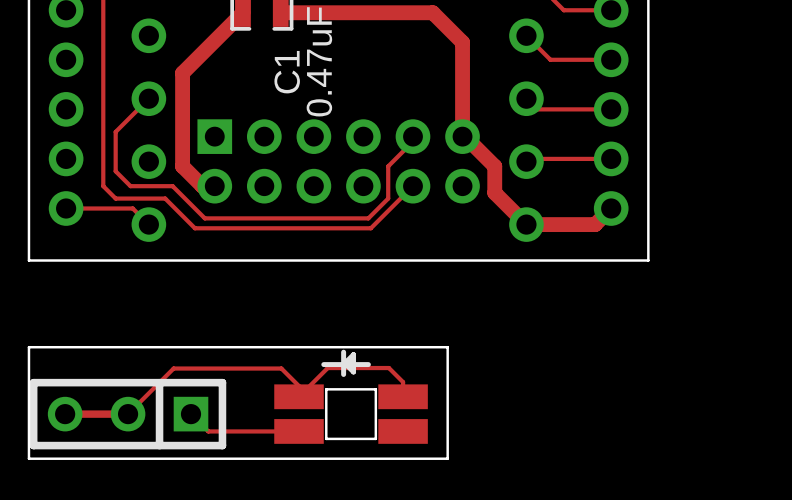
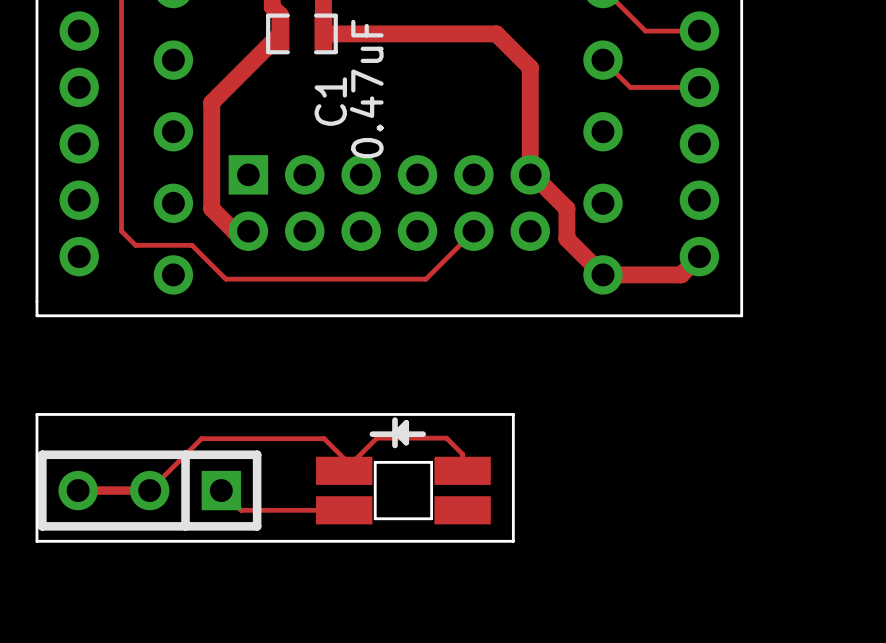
track: (148, 98) (115, 131) (115, 171) (130, 186) (172, 186) (204, 218) (368, 218) (388, 198) (388, 166) (412, 141) (412, 136) -> none
track: (526, 98) (537, 109) (611, 109) -> none
track: (611, 158) (529, 158) (526, 161) -> none
track: (66, 208) (132, 208) (148, 224) -> none

